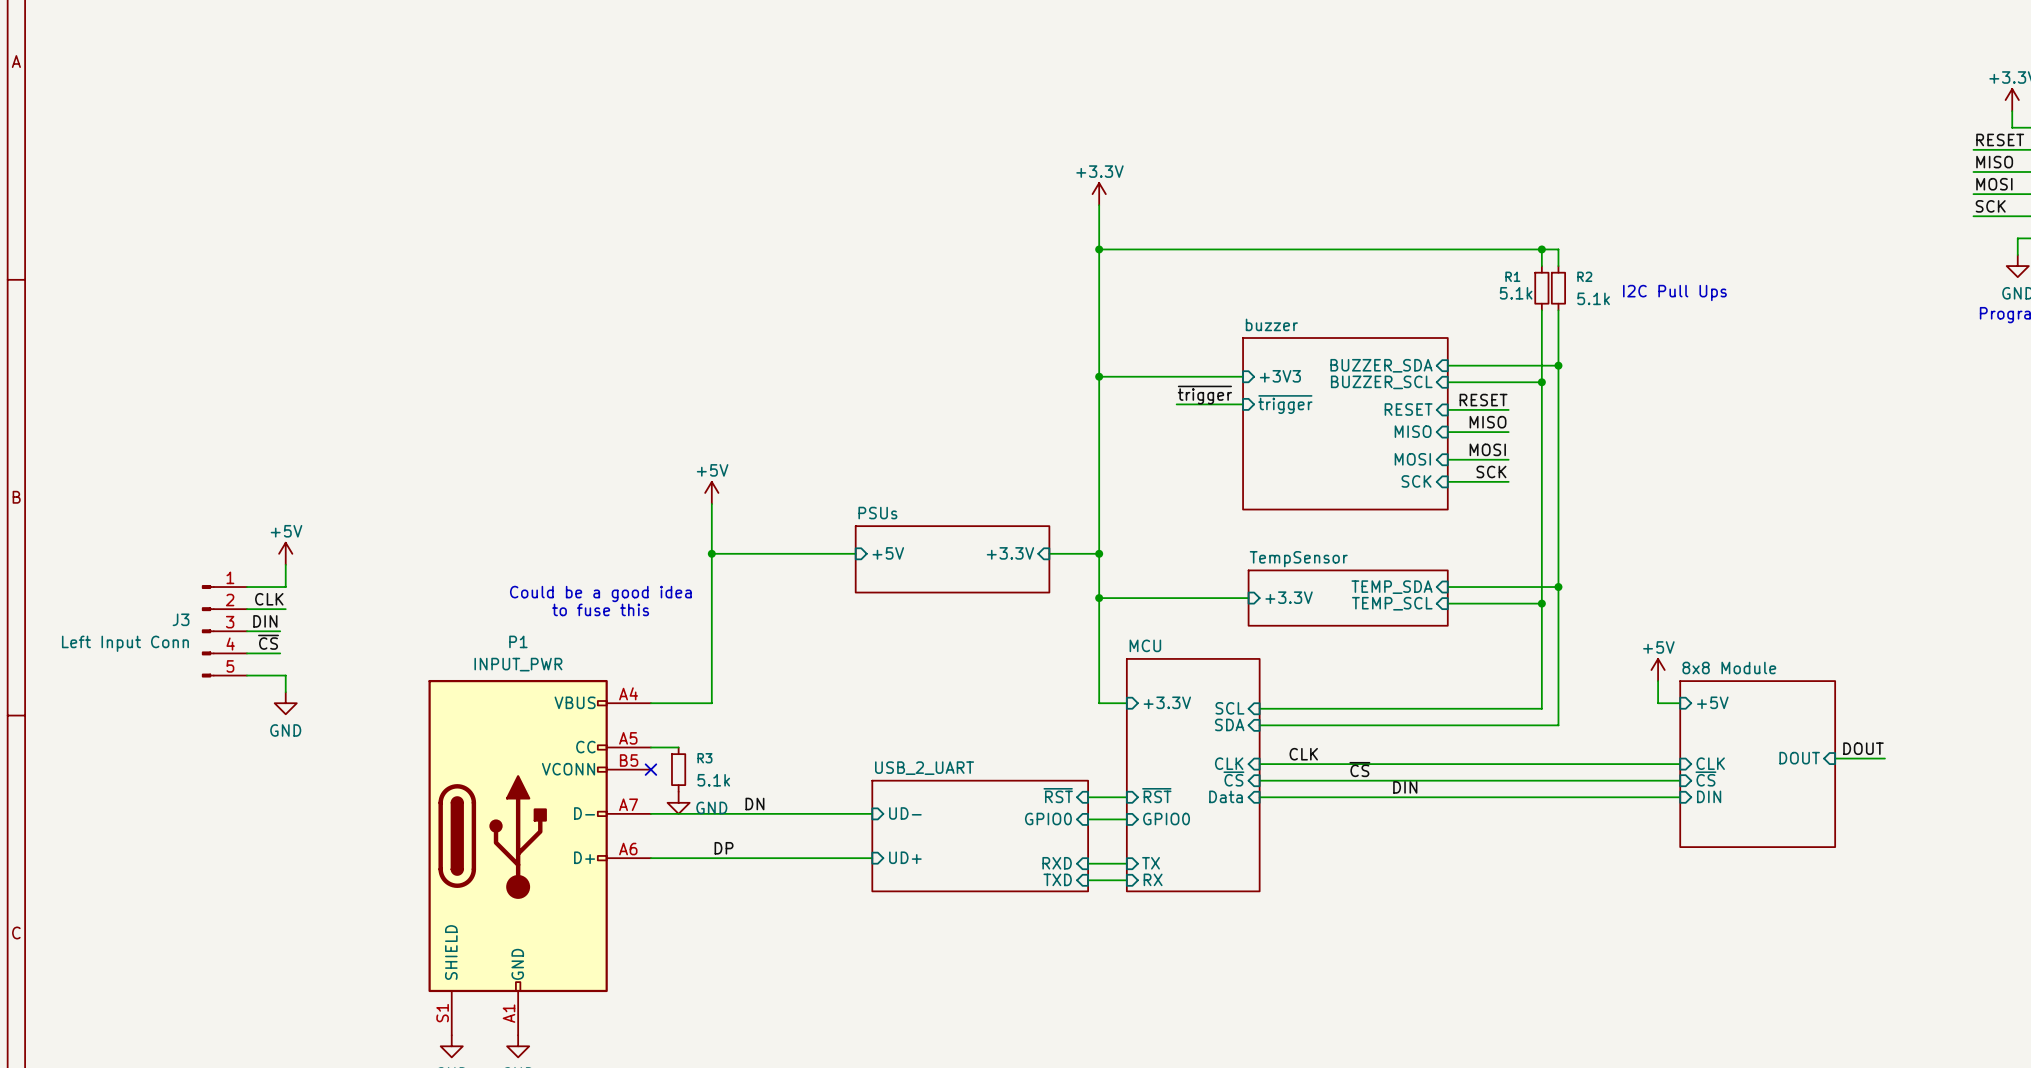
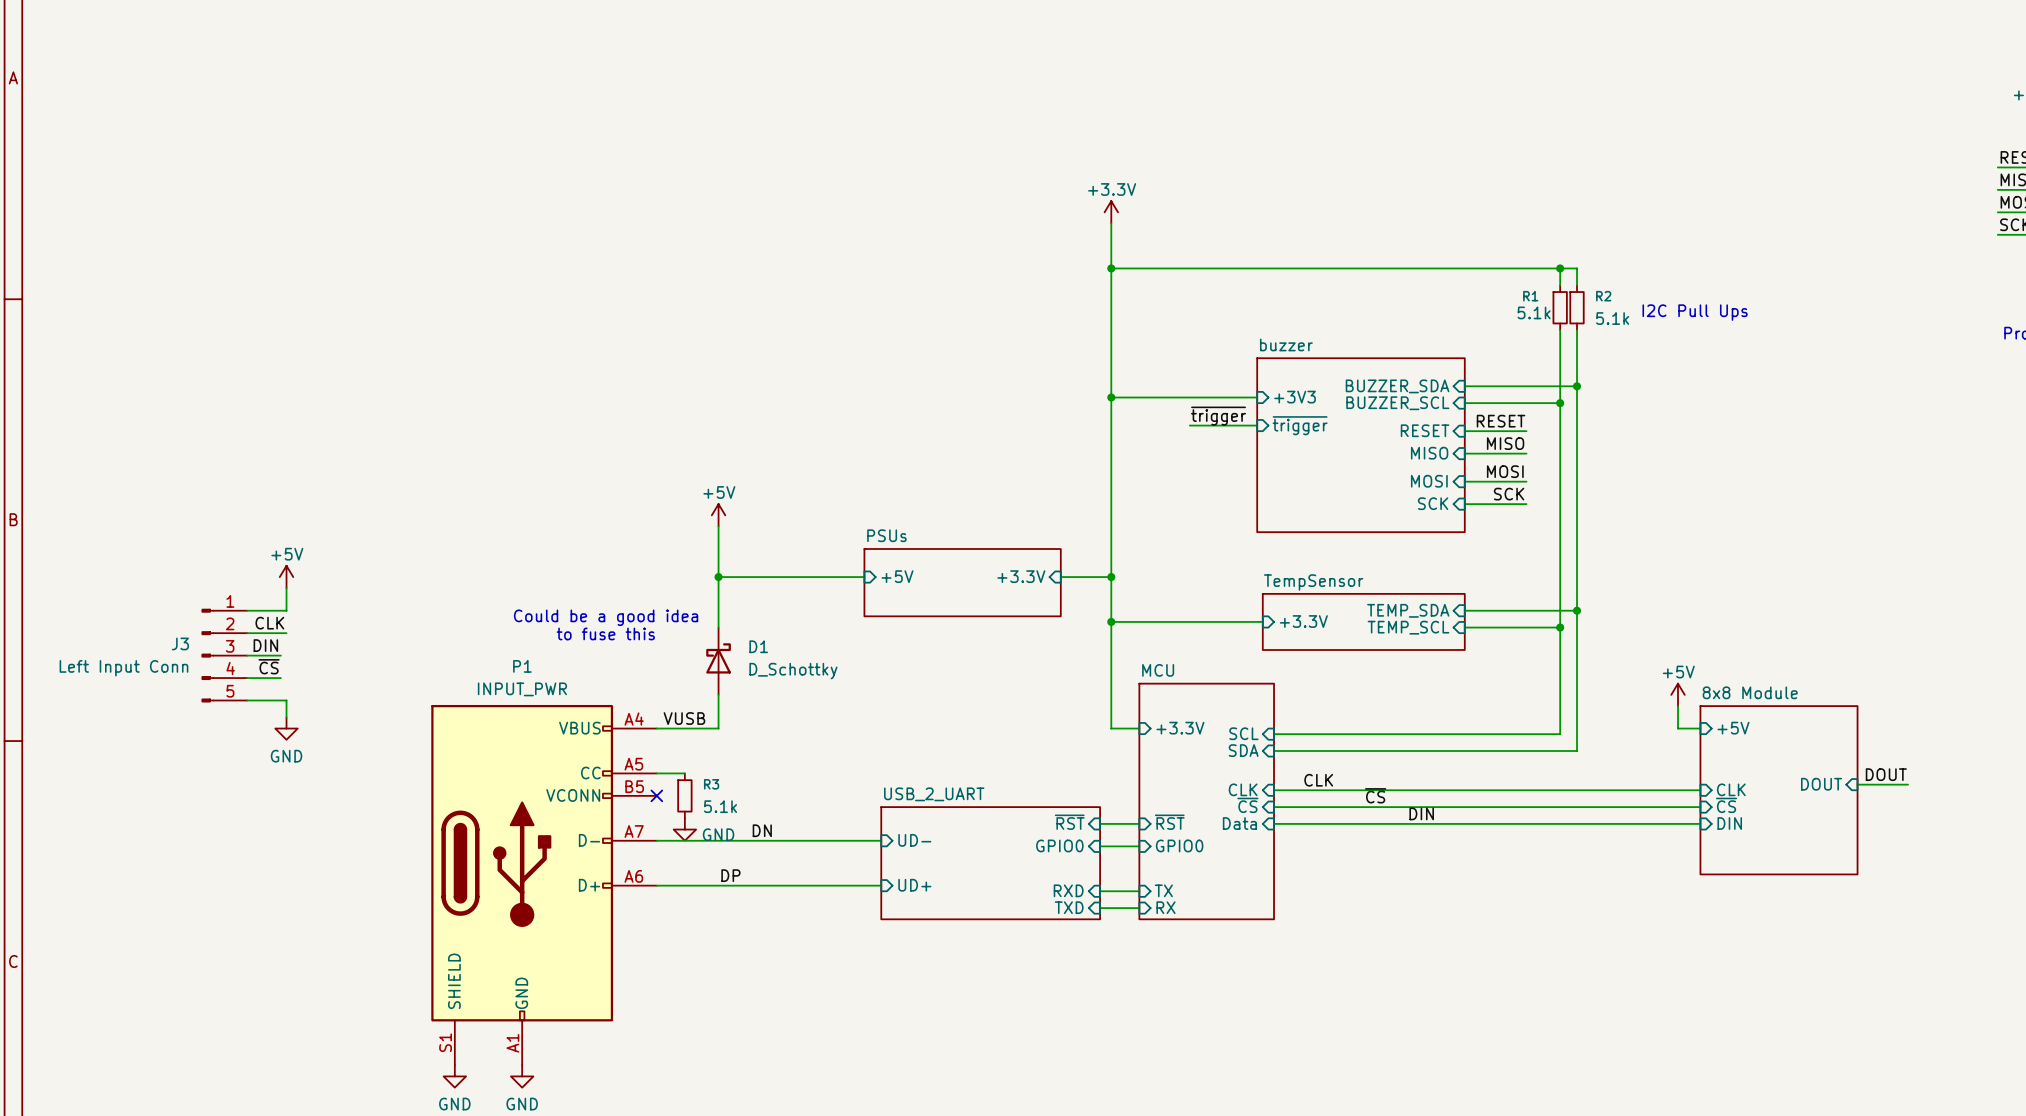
D1: none -> D_Schottky (718, 661)
label: none -> VUSB (684, 718)

